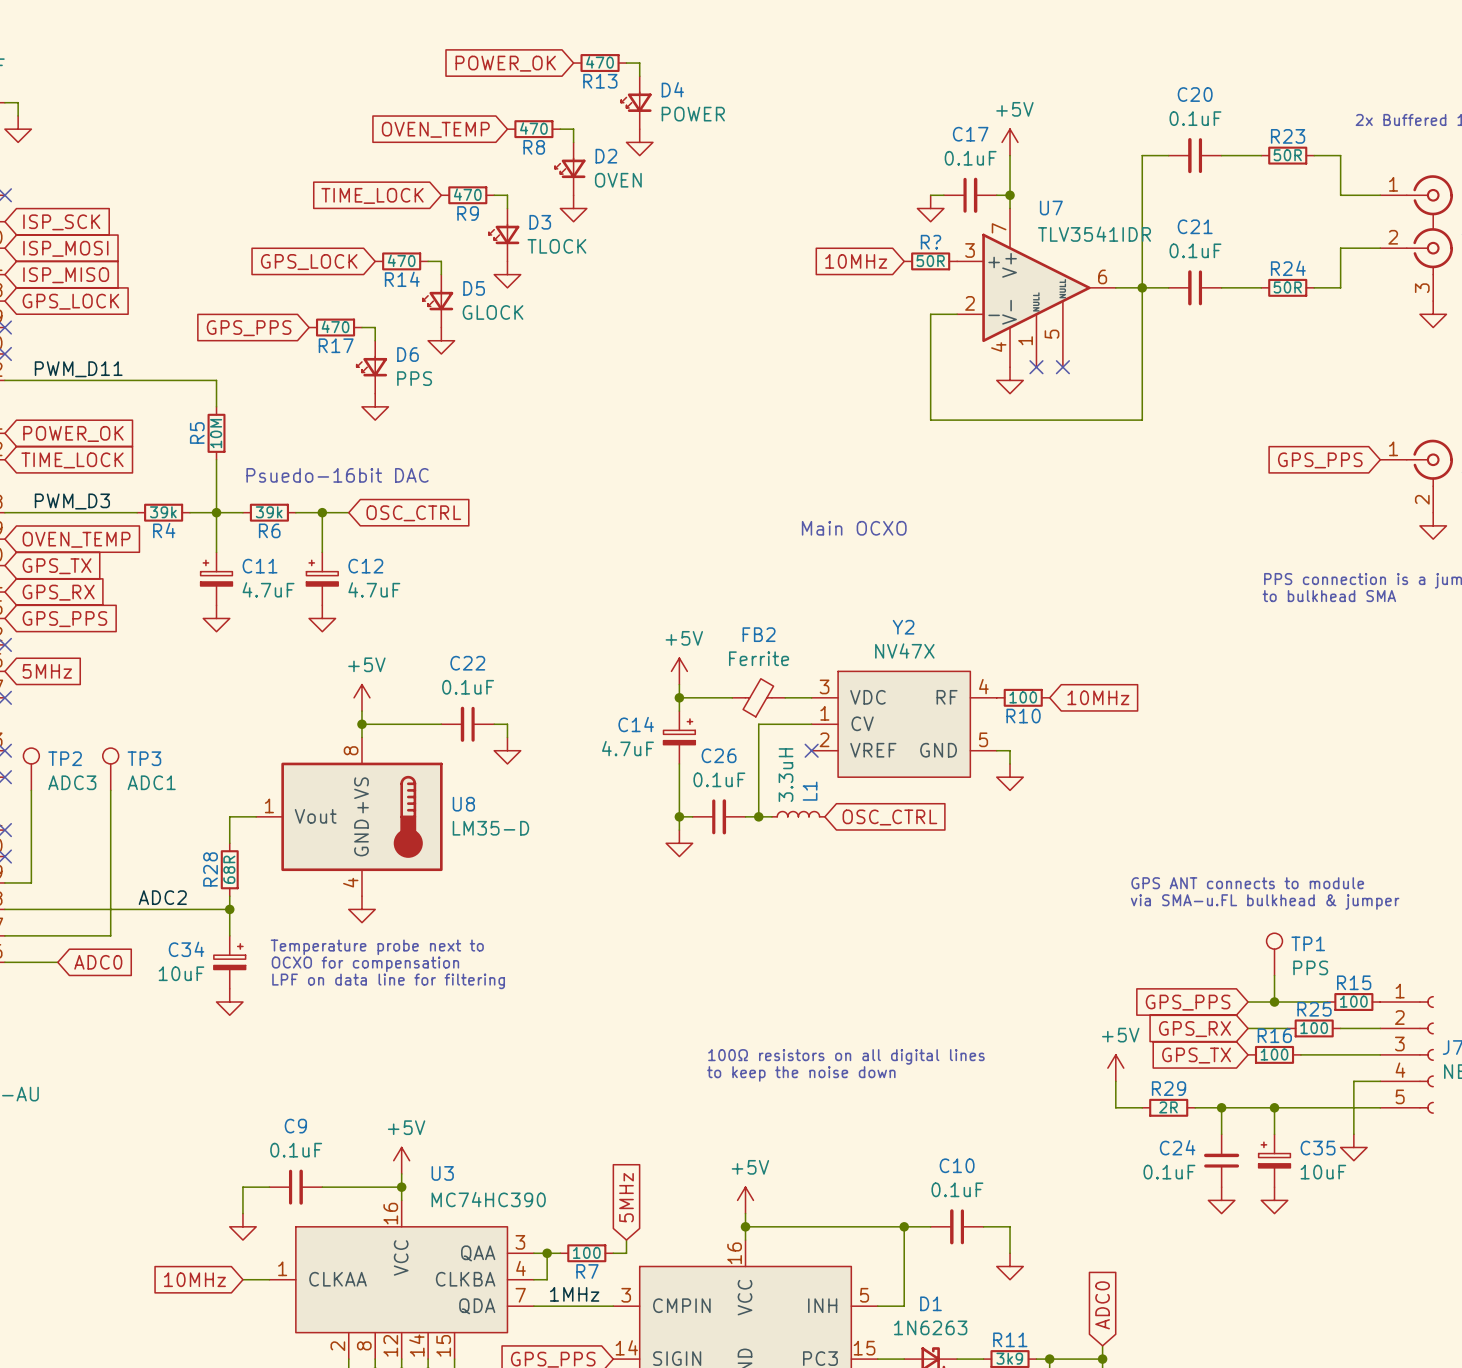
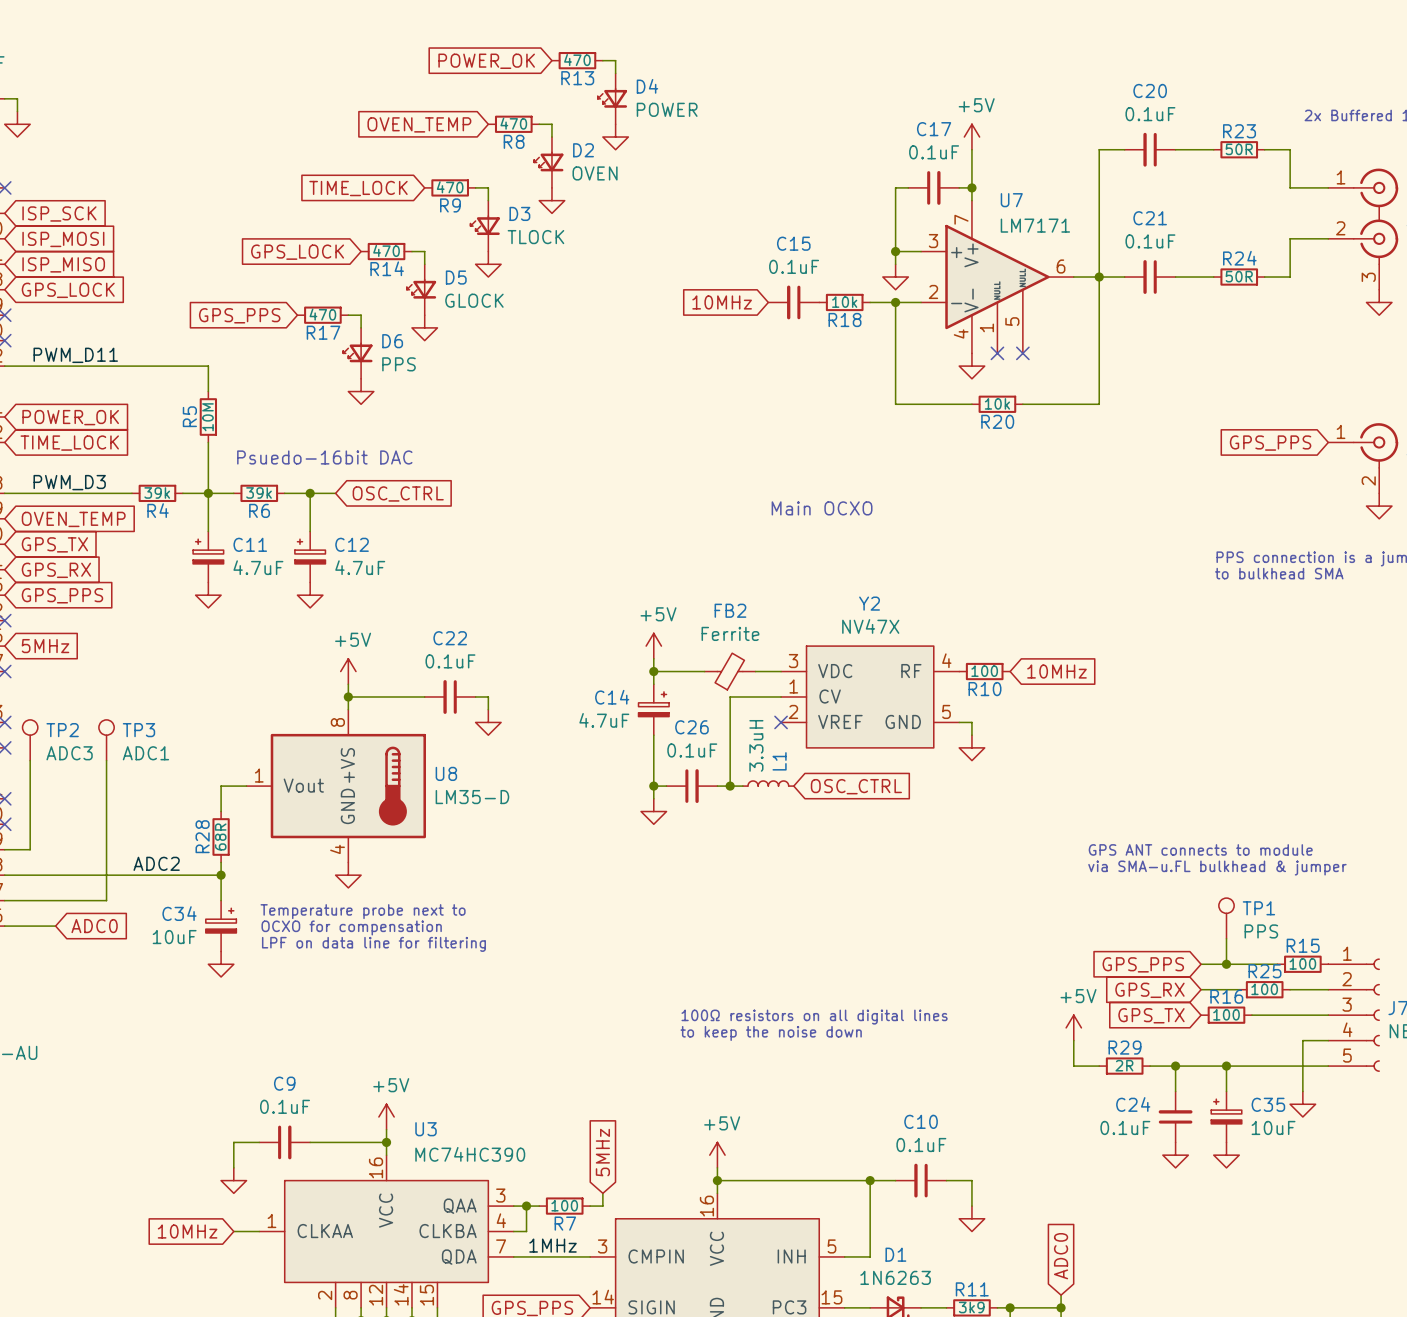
wire: none -> (895, 187) (895, 264)
power symbol position: (930, 208) -> (895, 277)
U7 value: TLV3541IDR (1094, 234) -> LM7171 (1035, 225)
global label position: 10MHz (856, 261) -> 10MHz (722, 302)
R?: 50R (930, 261) -> none
junction: none -> (895, 251)
C15: none -> 0.1uF (793, 302)
R18: none -> 10k (844, 302)
wire: none -> (870, 302) (895, 302)
junction: none -> (895, 302)
wire: (1010, 420) (1062, 420) -> none
R20: none -> 10k (997, 404)

